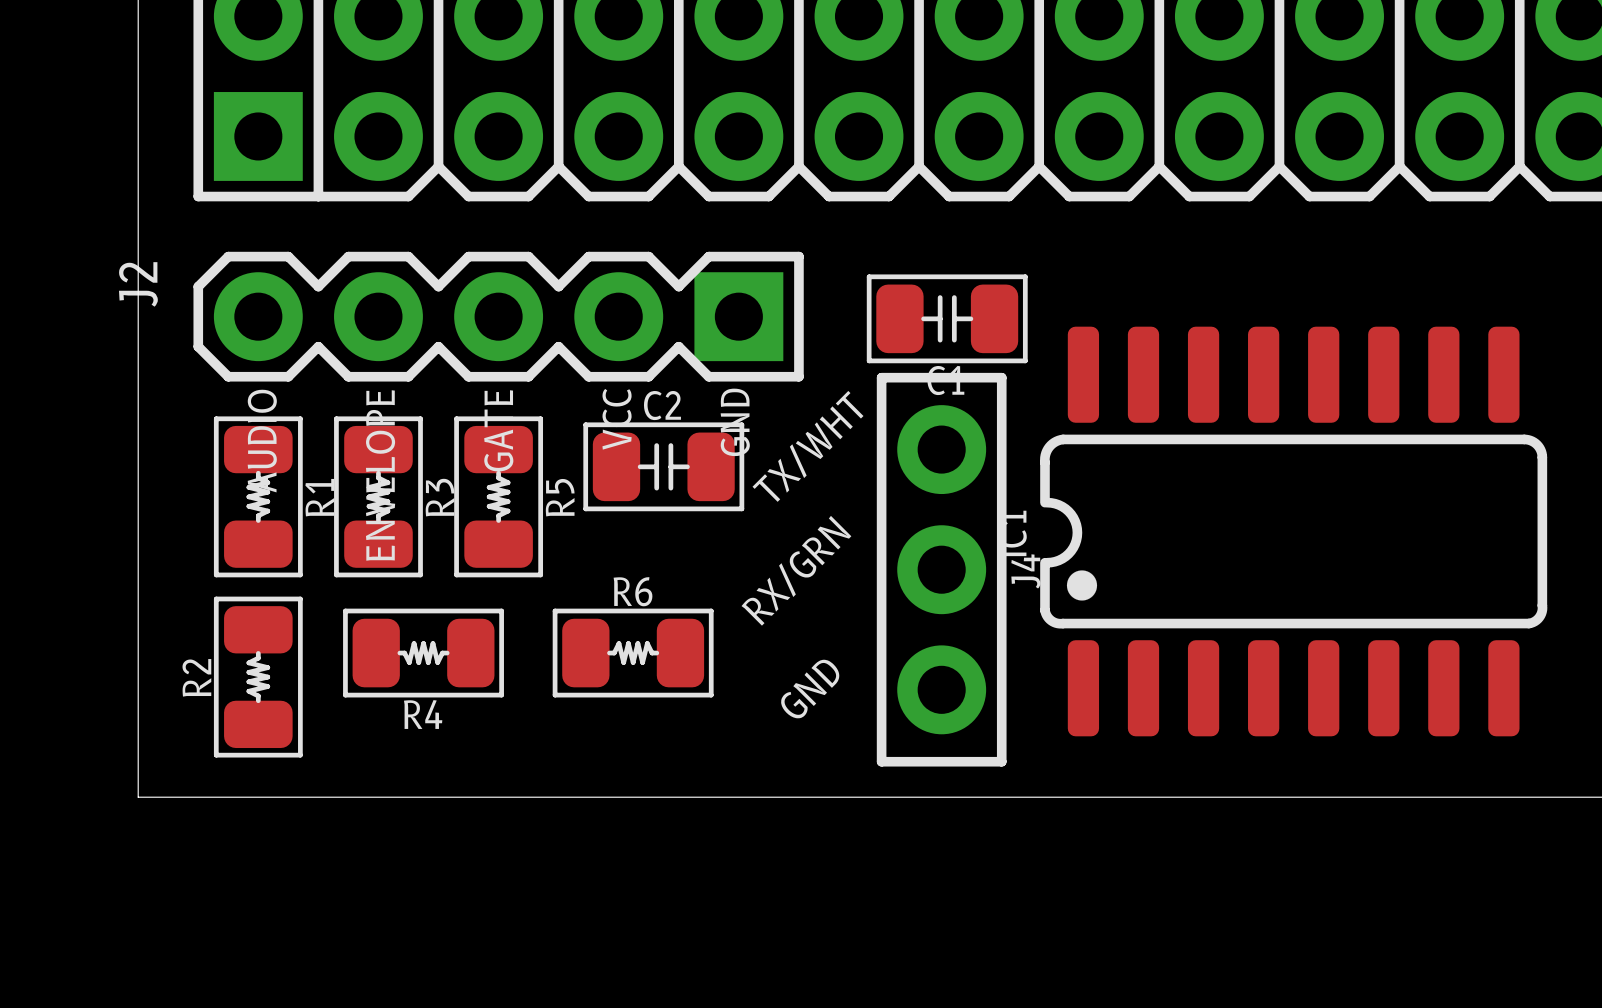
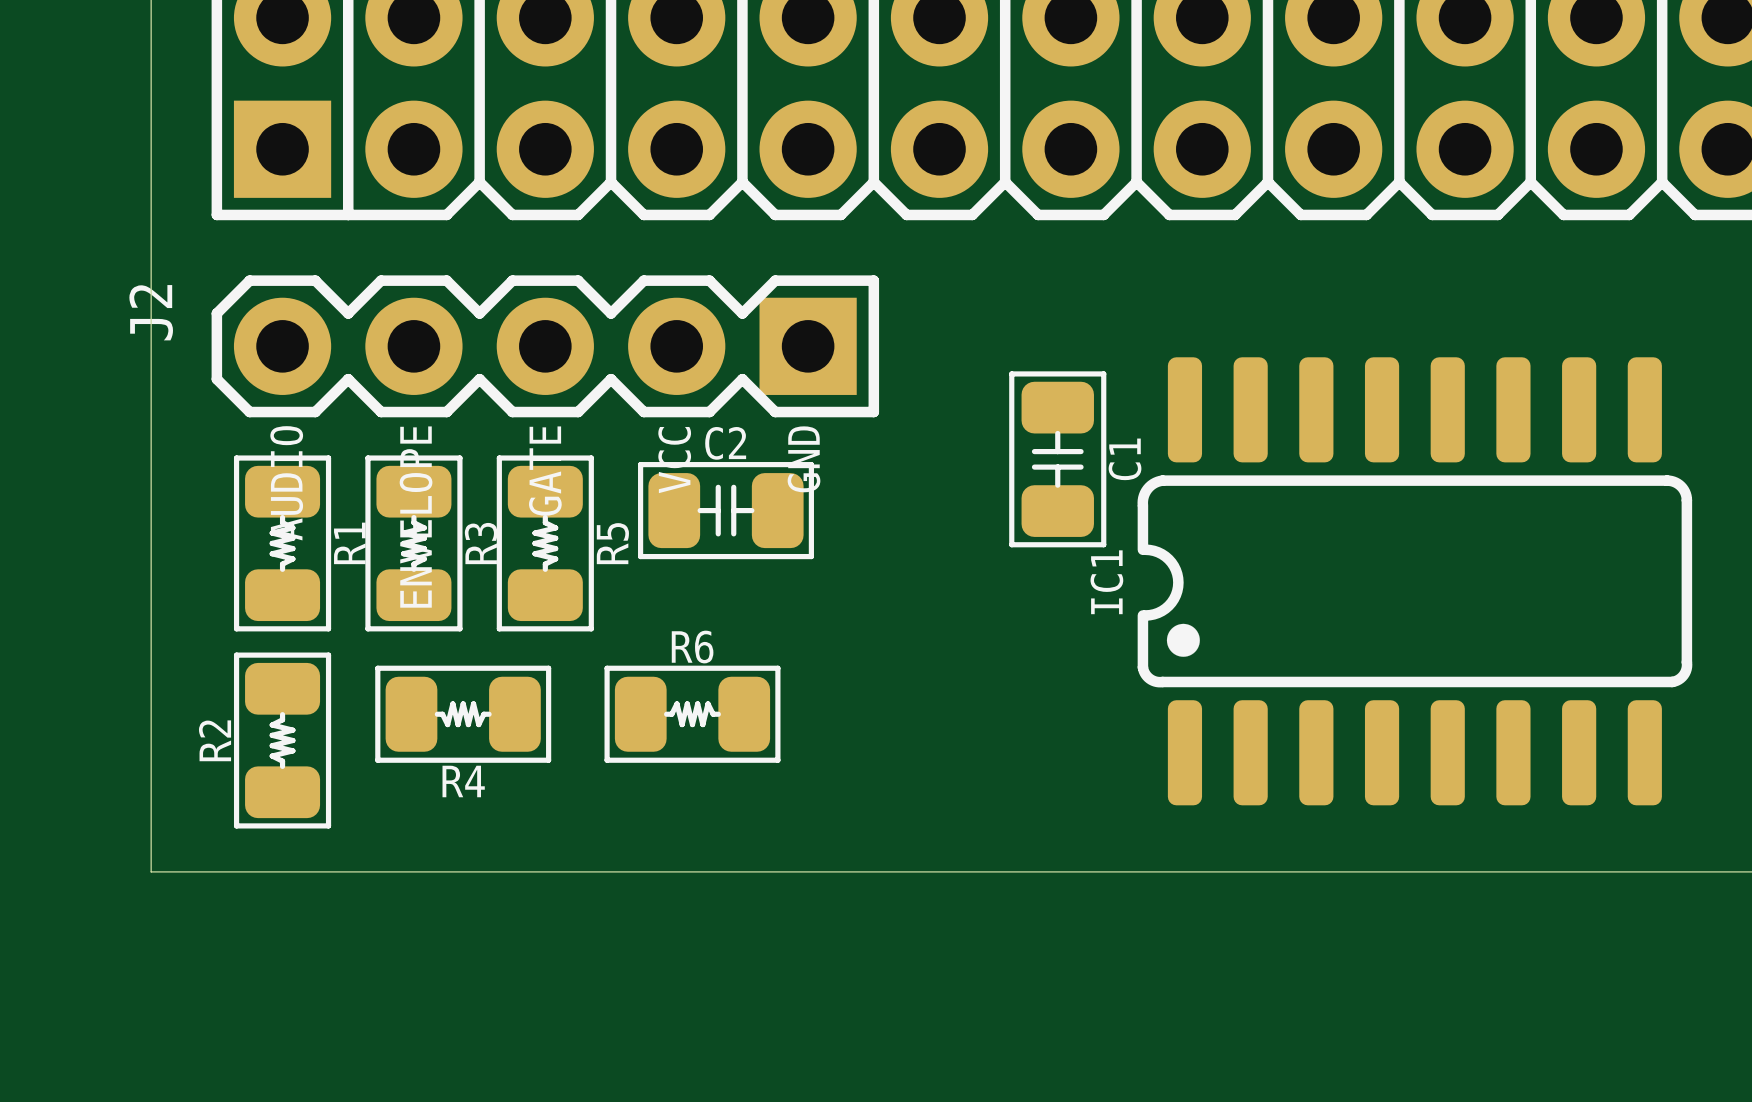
C1 footprint: [866, 274, 1028, 364] -> [1009, 371, 1107, 548]
text: TX/WHT (808, 446) -> none
J4: (941, 569) -> none
text: RX/GRN (796, 570) -> none
text: GND (810, 689) -> none

